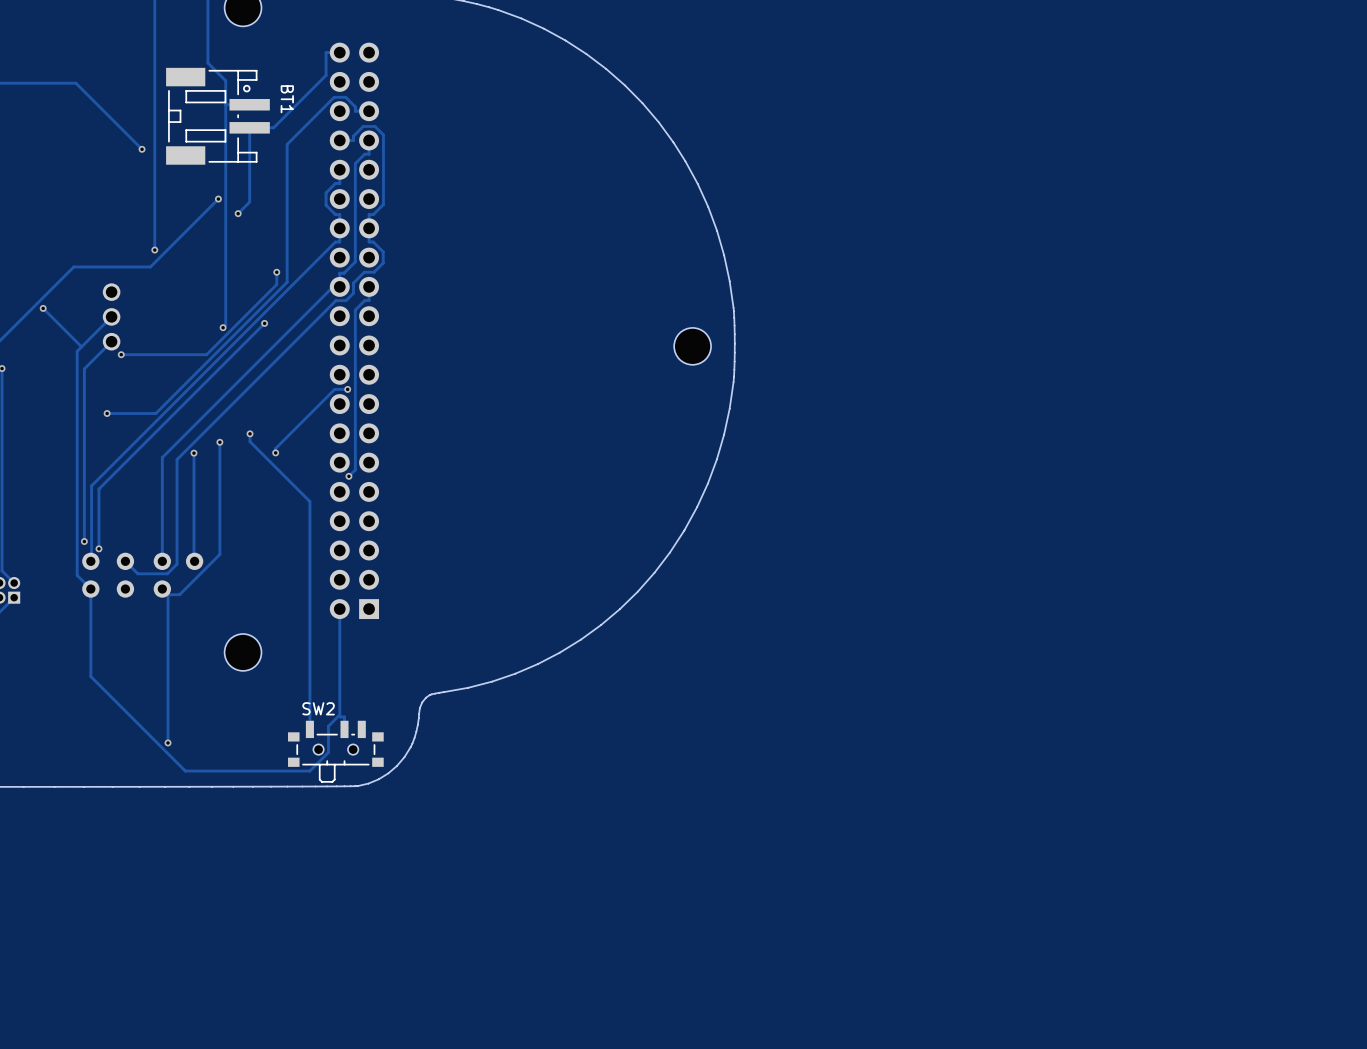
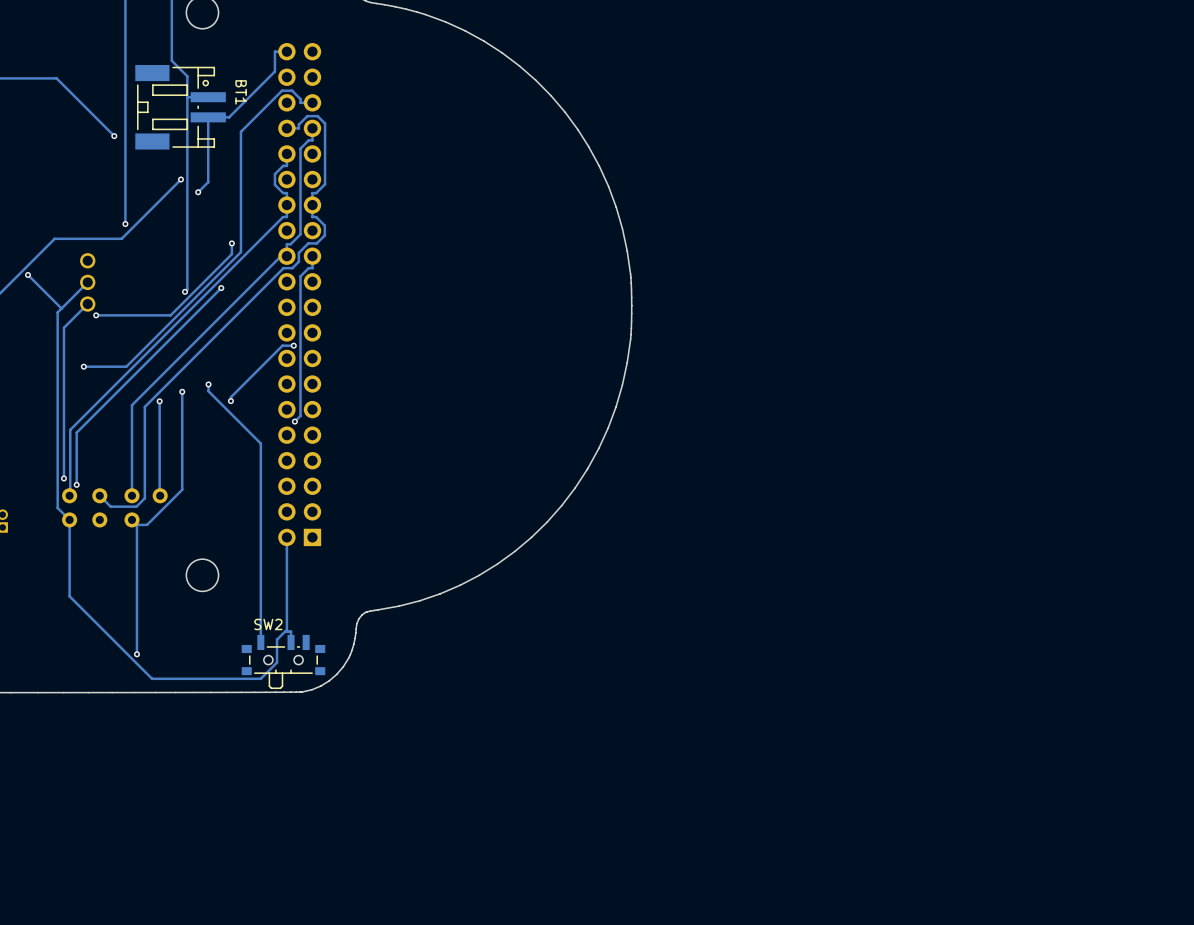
part: (692, 346) -> none

